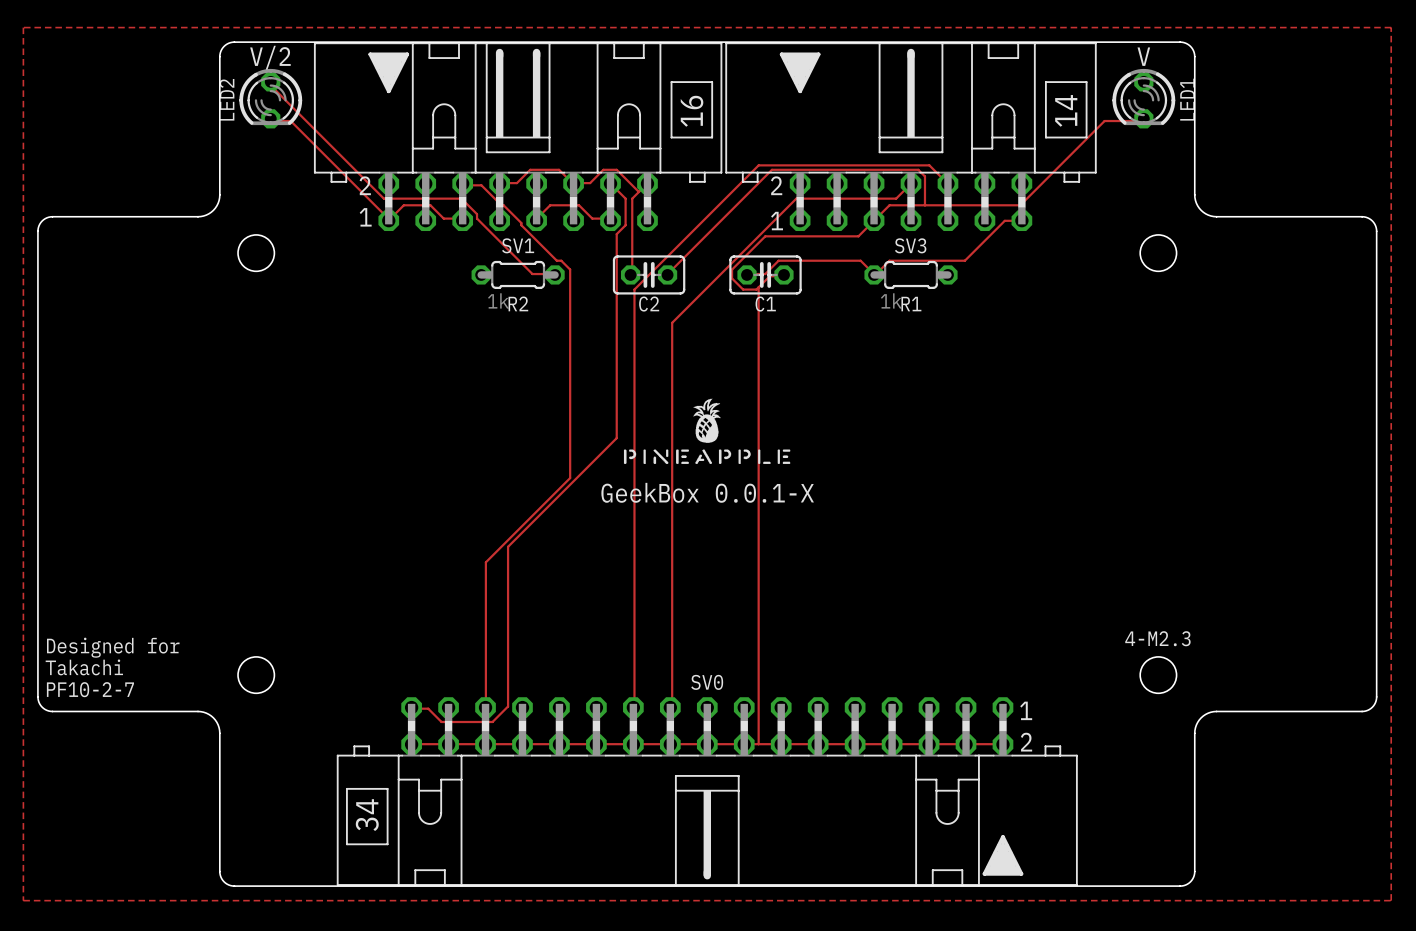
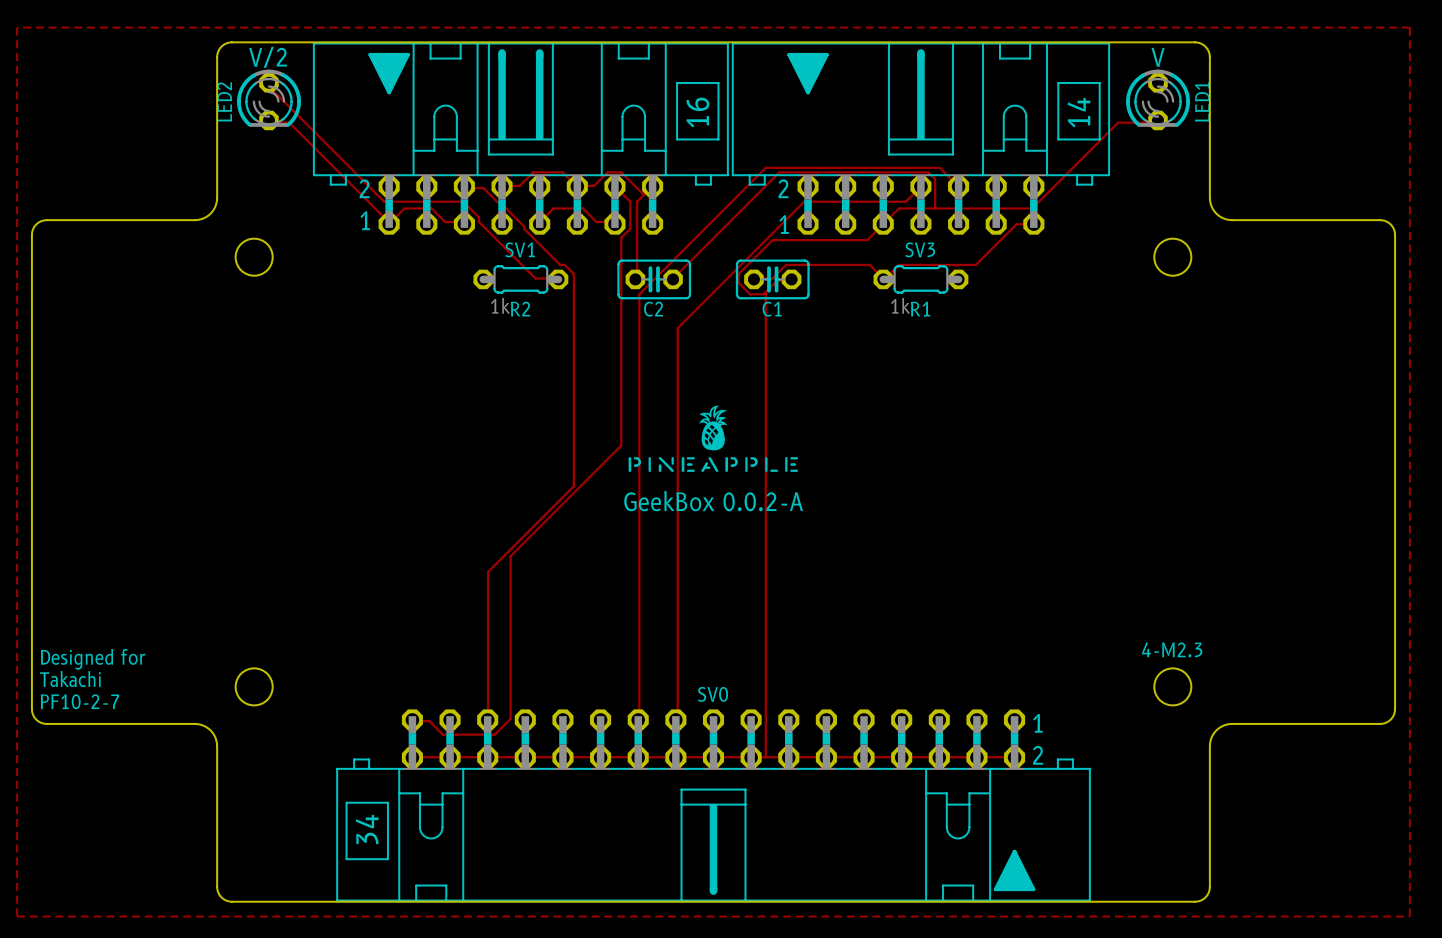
text: GeekBox 0.0.1-X (707, 492) -> GeekBox 0.0.2-A (713, 501)

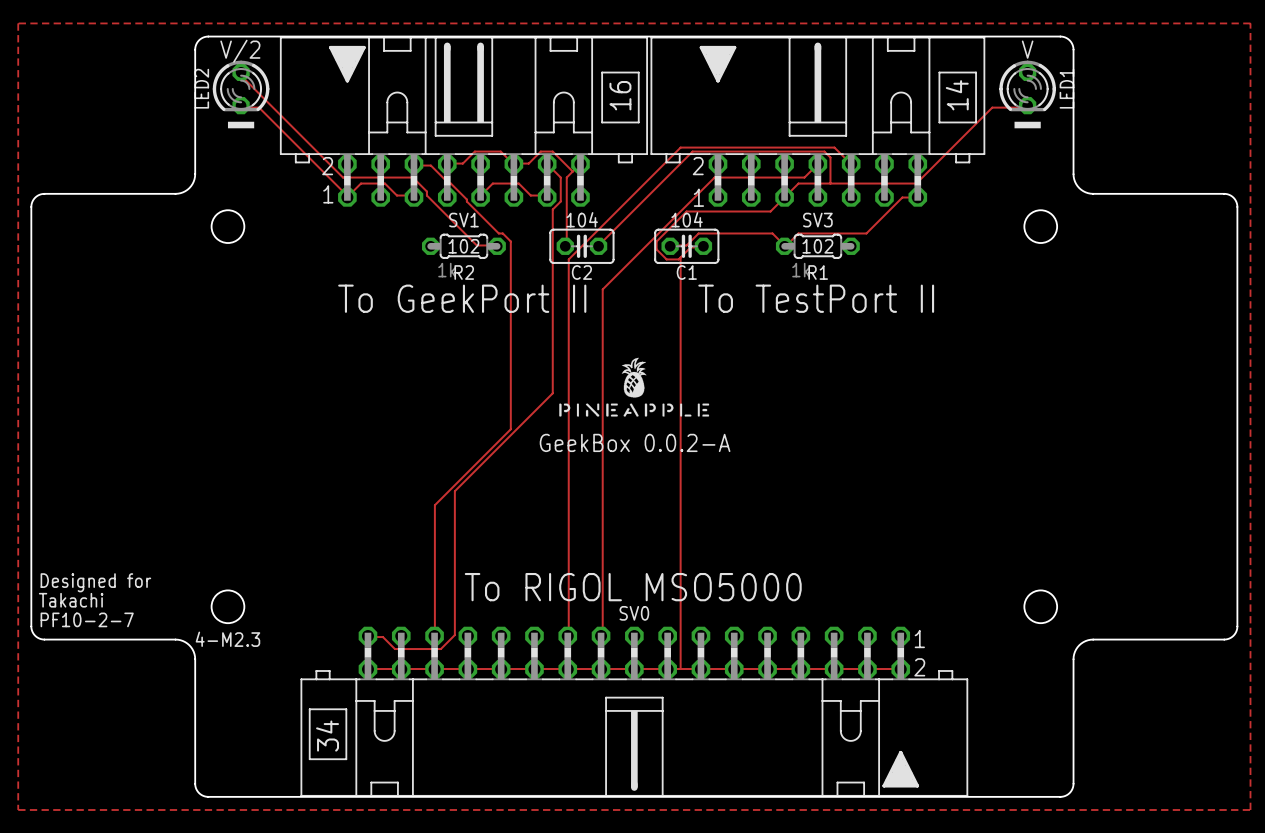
drawing: none -> [227, 121, 255, 129]
drawing: none -> [1014, 121, 1041, 129]
text: none -> 104 (582, 219)
text: none -> 104 (687, 219)
text: none -> 102 (463, 246)
text: none -> 102 (817, 246)
text: none -> To GeekPort II (462, 298)
text: none -> To TestPort II (816, 298)
text: 4-M2.3 (1172, 649) -> none
text: none -> To RIGOL MSO5000 (633, 587)
text: none -> 4-M2.3 (227, 639)

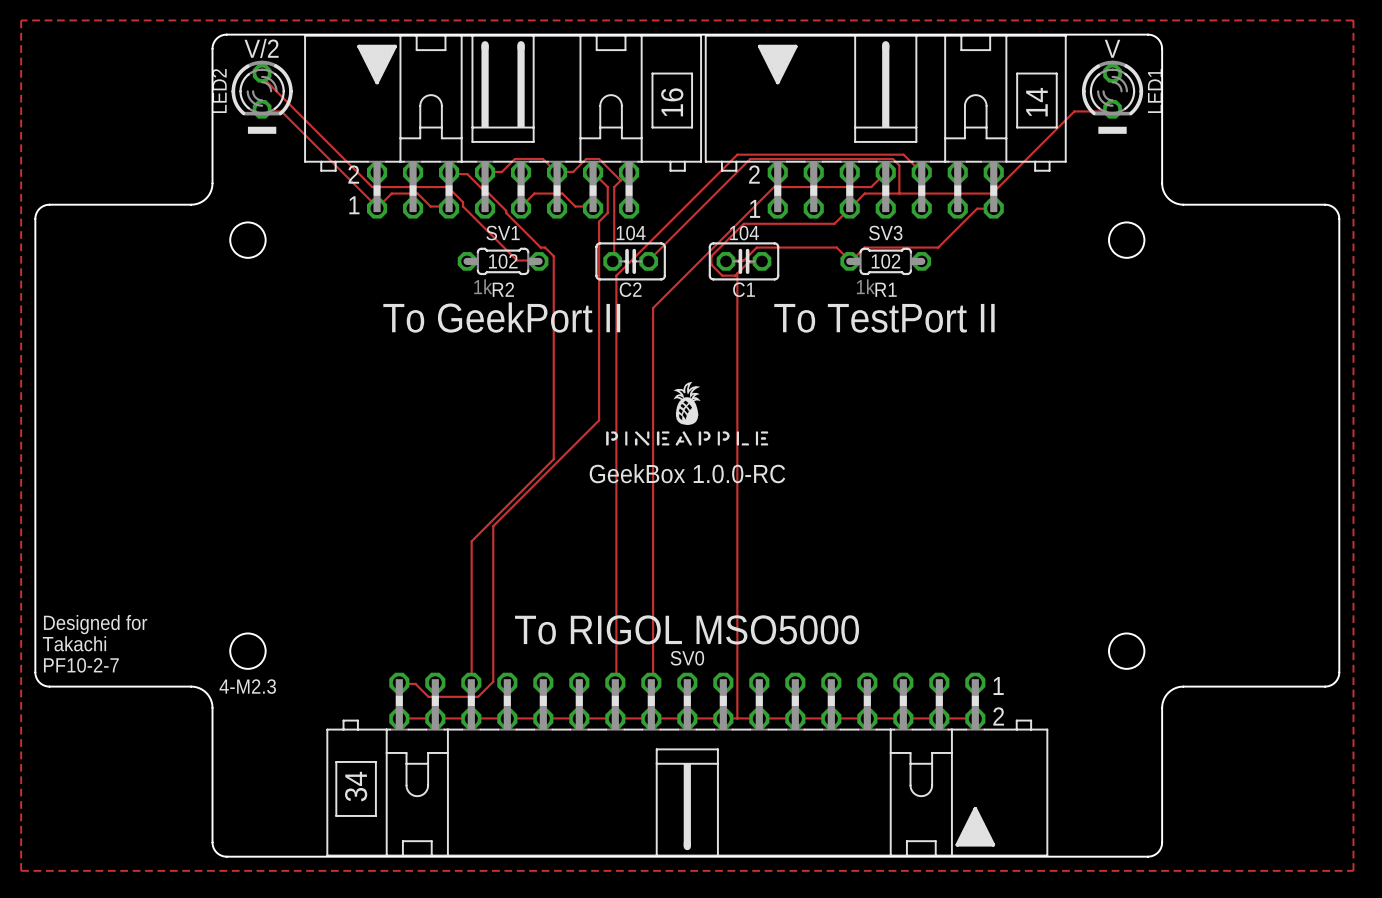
text: GeekBox 0.0.2-A (635, 442) -> GeekBox 1.0.0-RC (687, 473)

